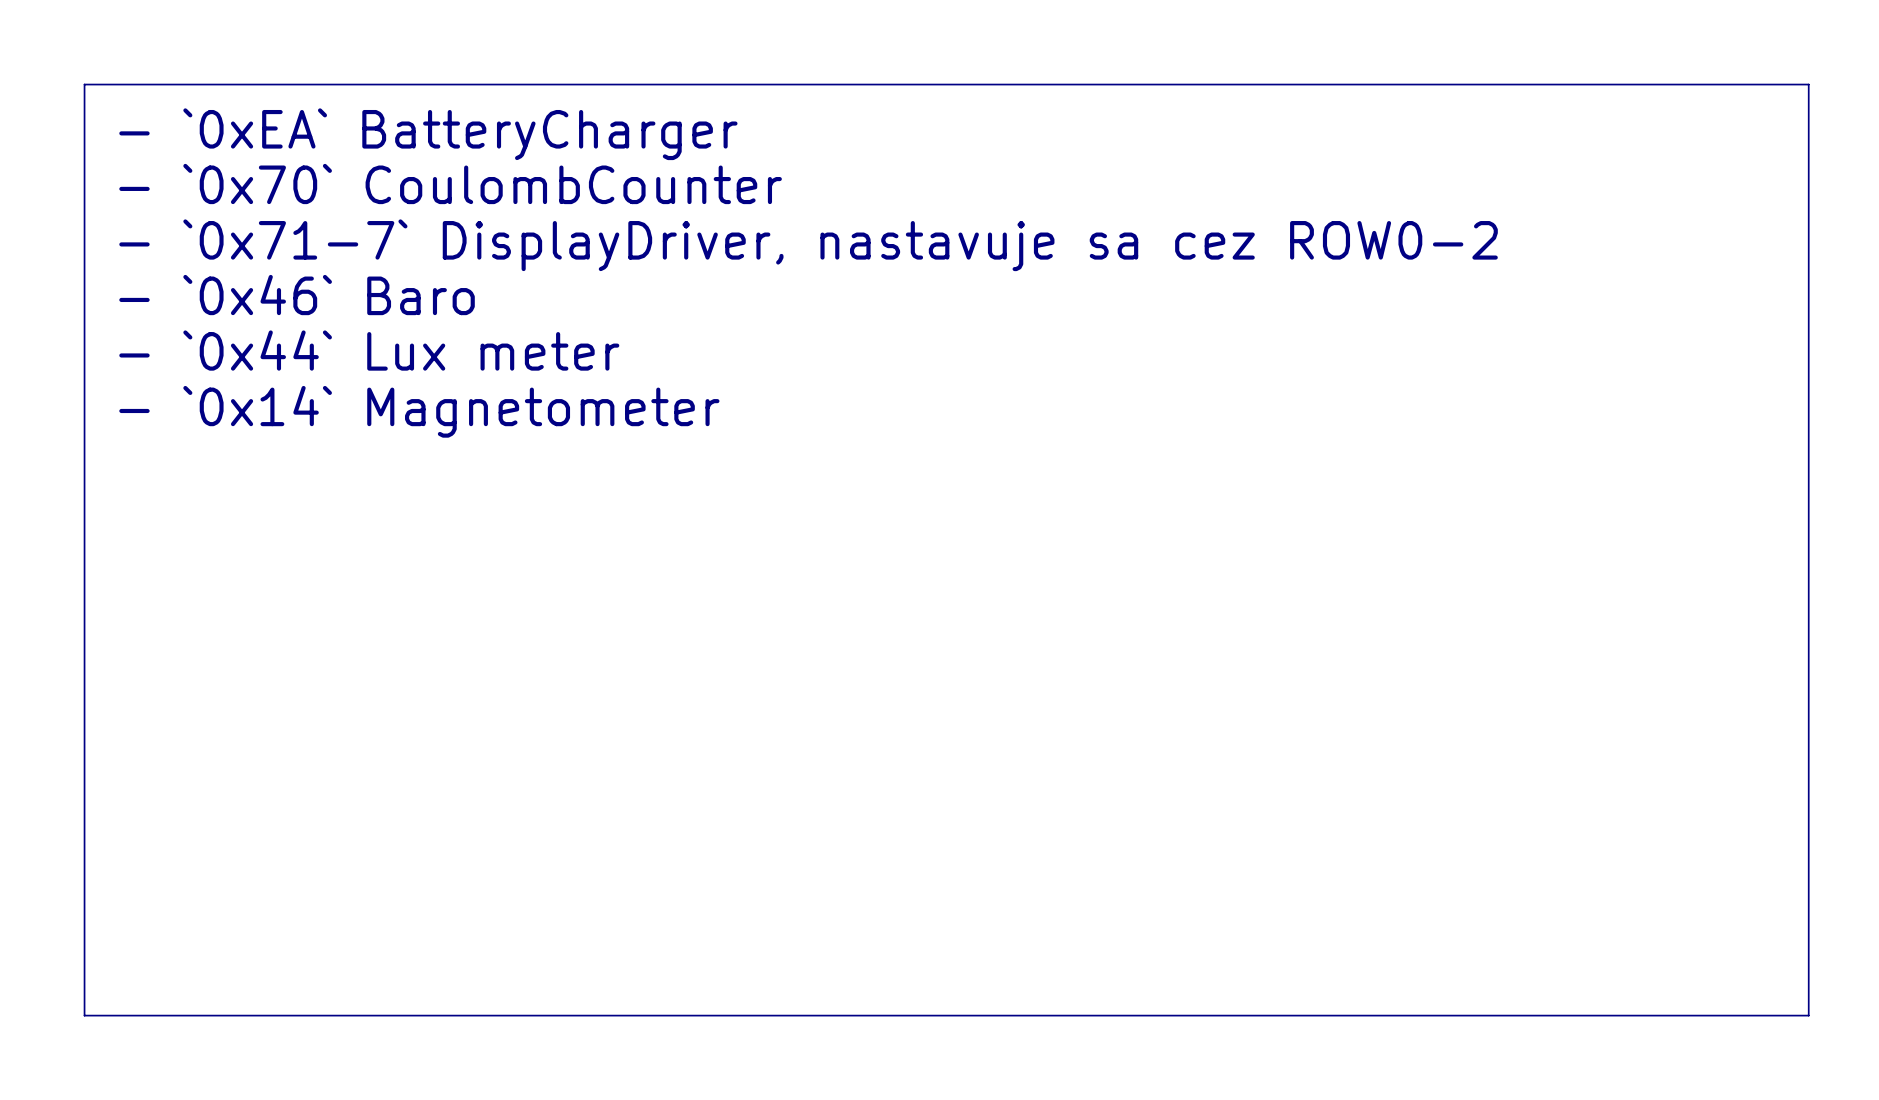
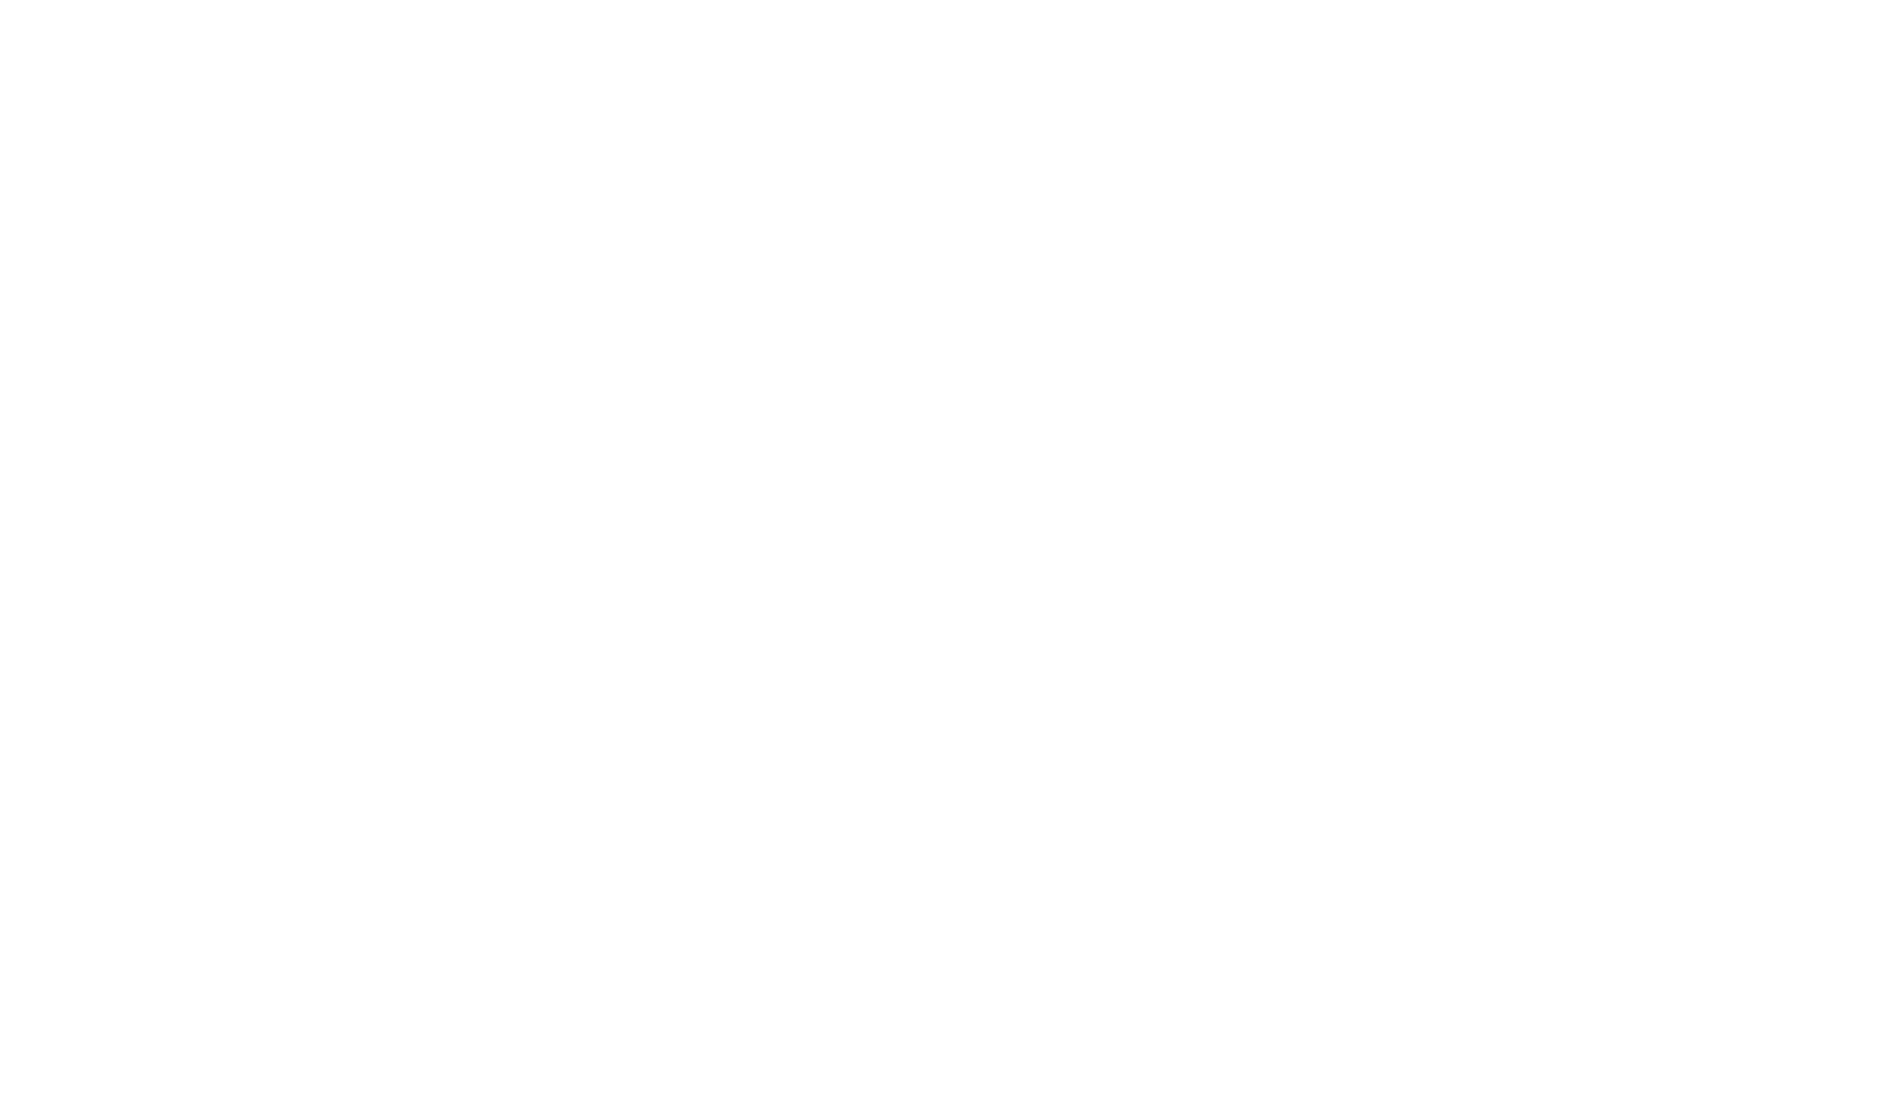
line: (84, 84) (1808, 84) (1808, 1015) (84, 1015) (84, 84) -> none
text: - `0xEA` BatteryCharger (428, 134) -> none
text: - `0x70` CoulombCounter (450, 183) -> none
text: - `0x71-7` DisplayDriver, nastavuje sa cez ROW0-2 (808, 245) -> none
text: - `0x46` Baro (297, 295) -> none
text: - `0x44` Lux meter (369, 350) -> none
text: - `0x14` Magnetometer (419, 411) -> none

